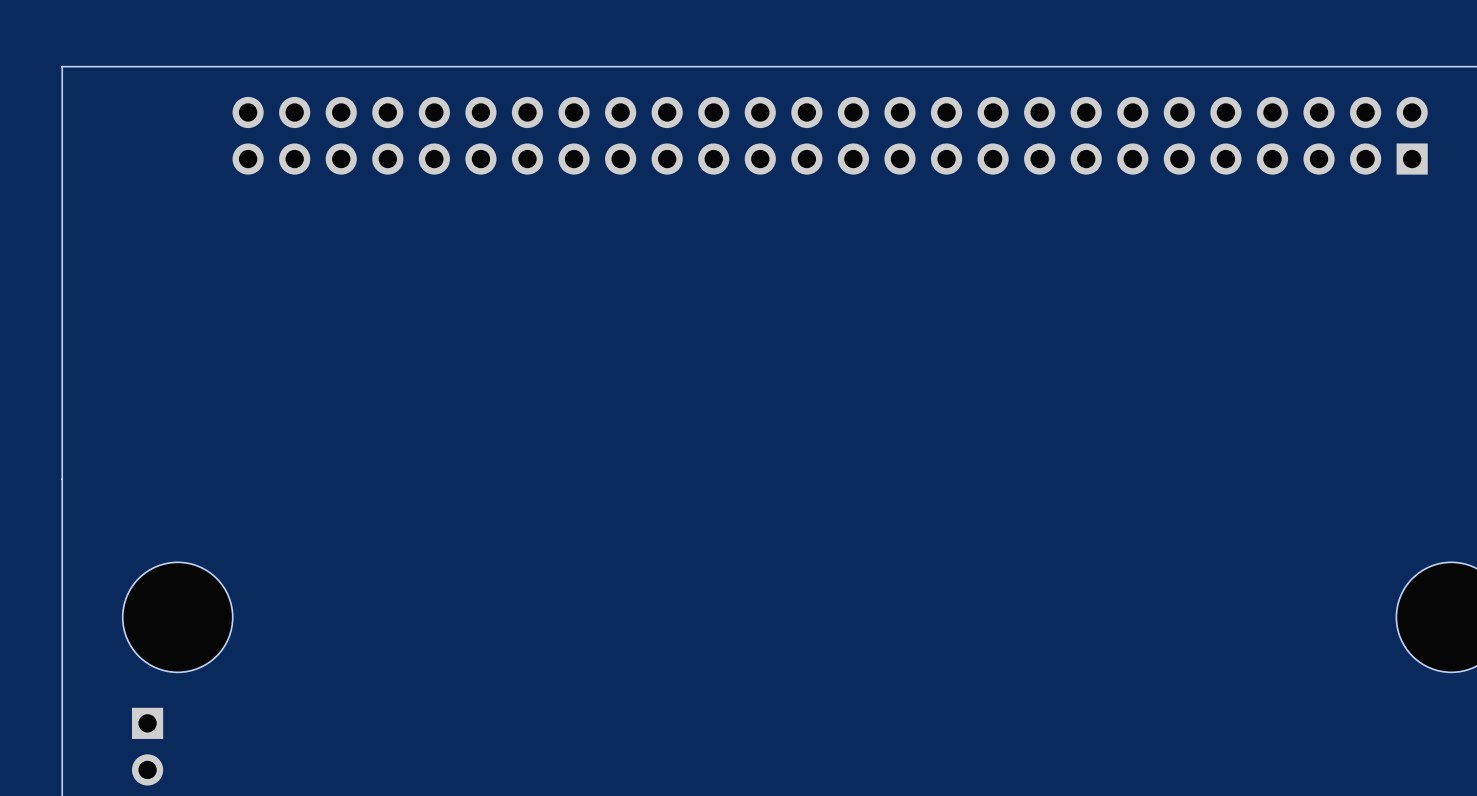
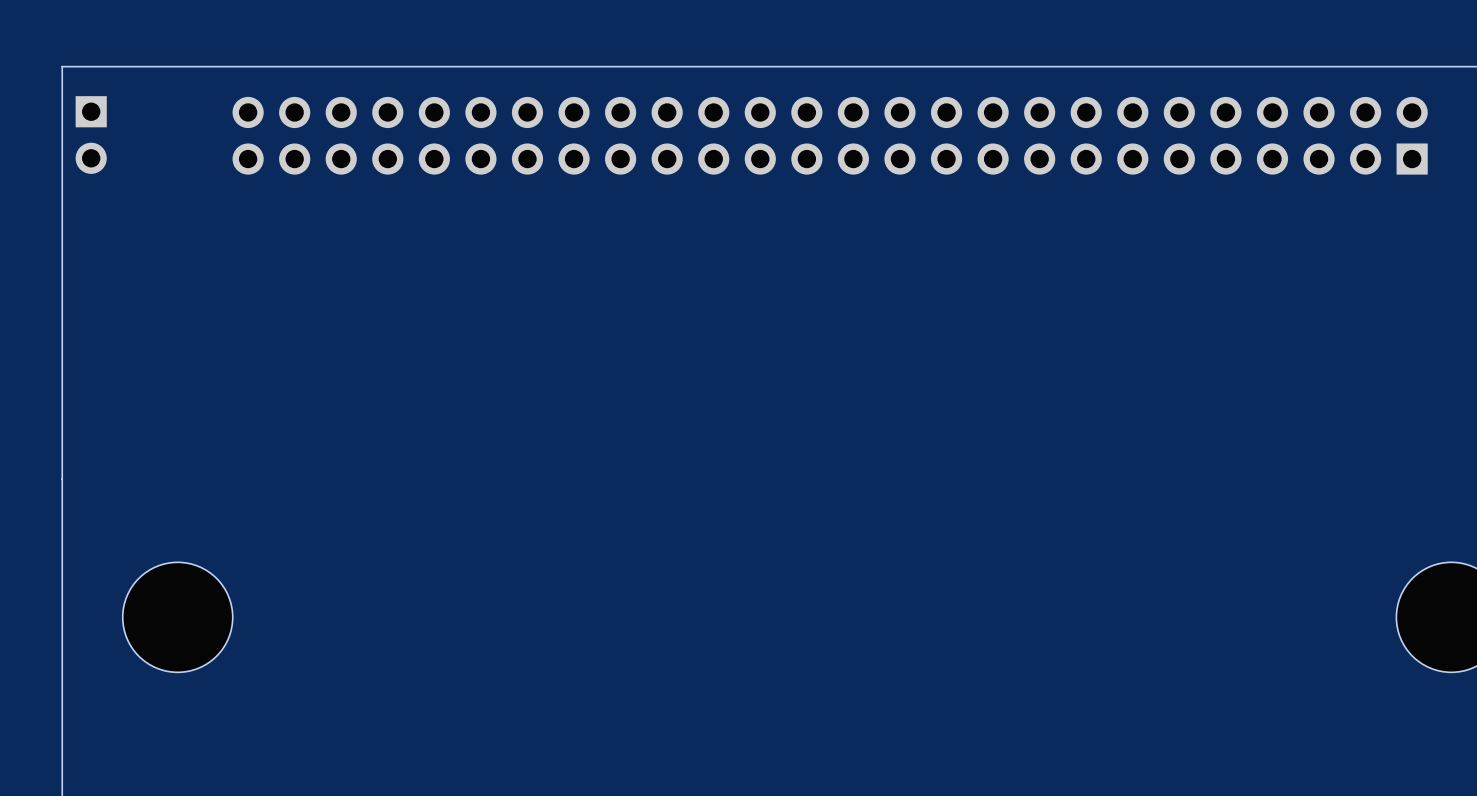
part: none -> (91, 135)
part: (147, 746) -> none

